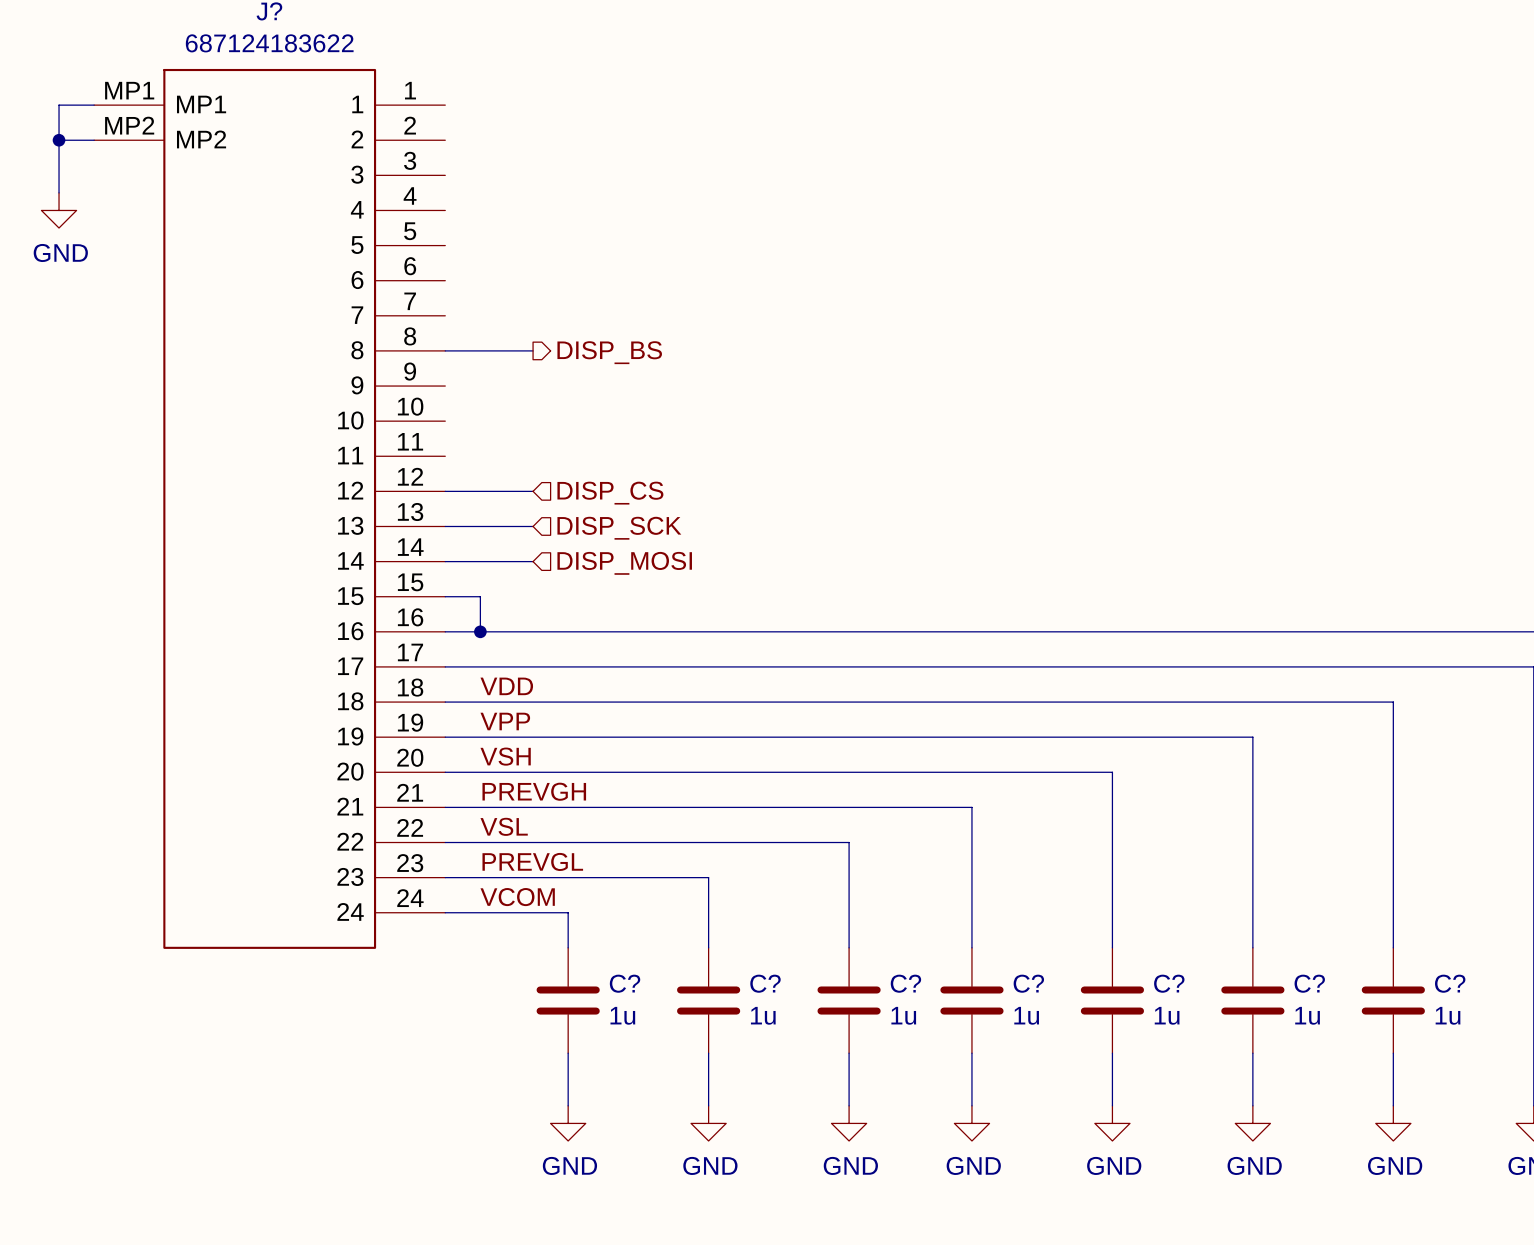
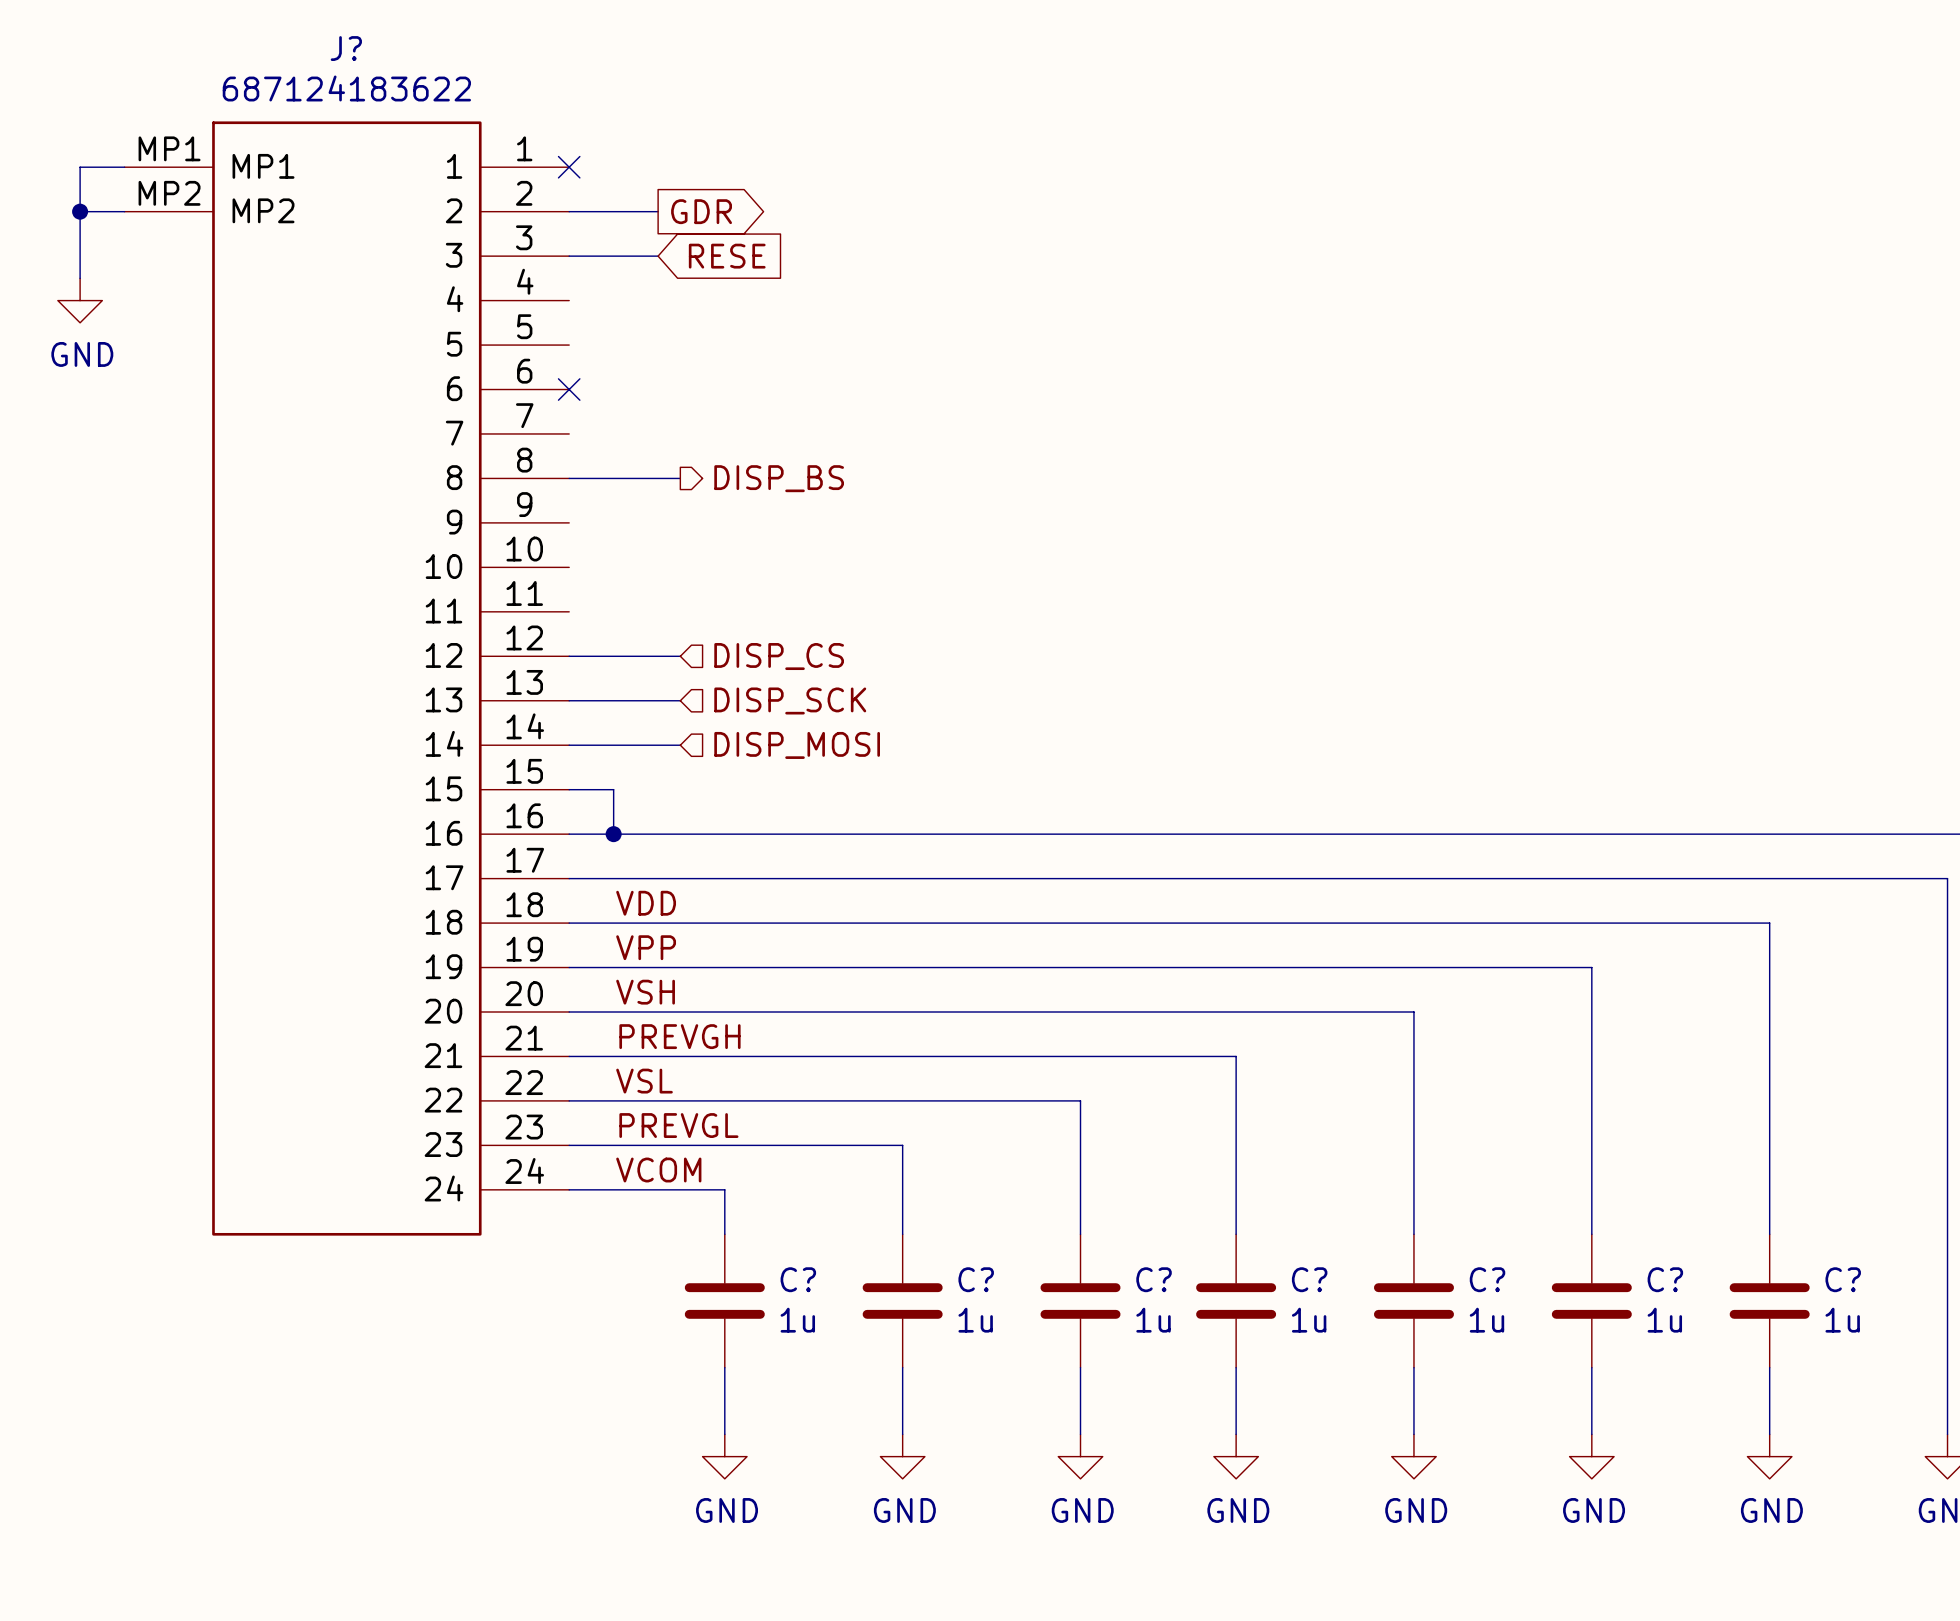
no-connect mark: none -> (569, 167)
wire: none -> (569, 211) (658, 211)
global label: none -> GDR (701, 211)
wire: none -> (569, 256) (658, 256)
global label: none -> RESE (727, 256)
no-connect mark: none -> (569, 389)

